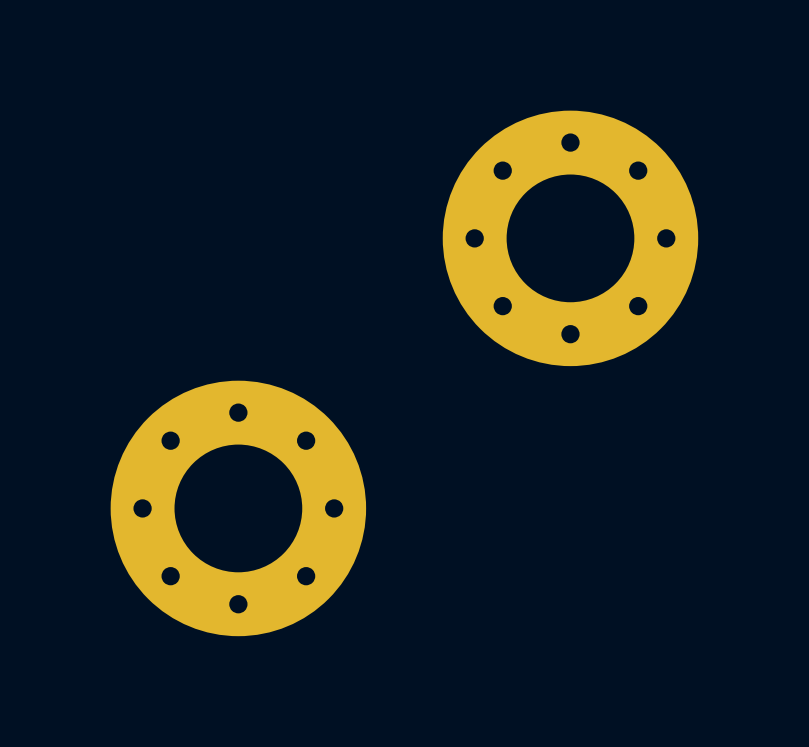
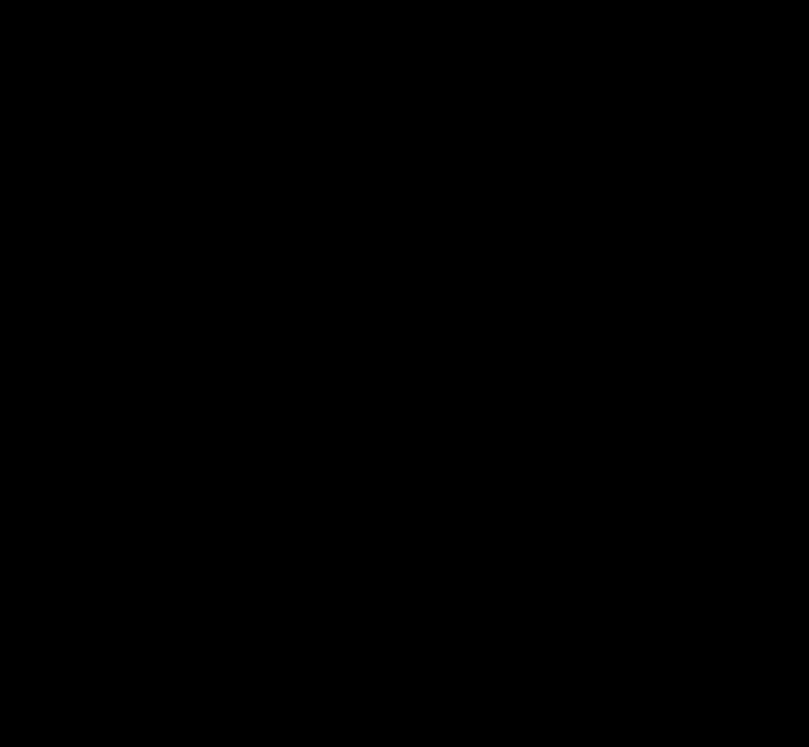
part: (570, 238) -> none
part: (238, 508) -> none

